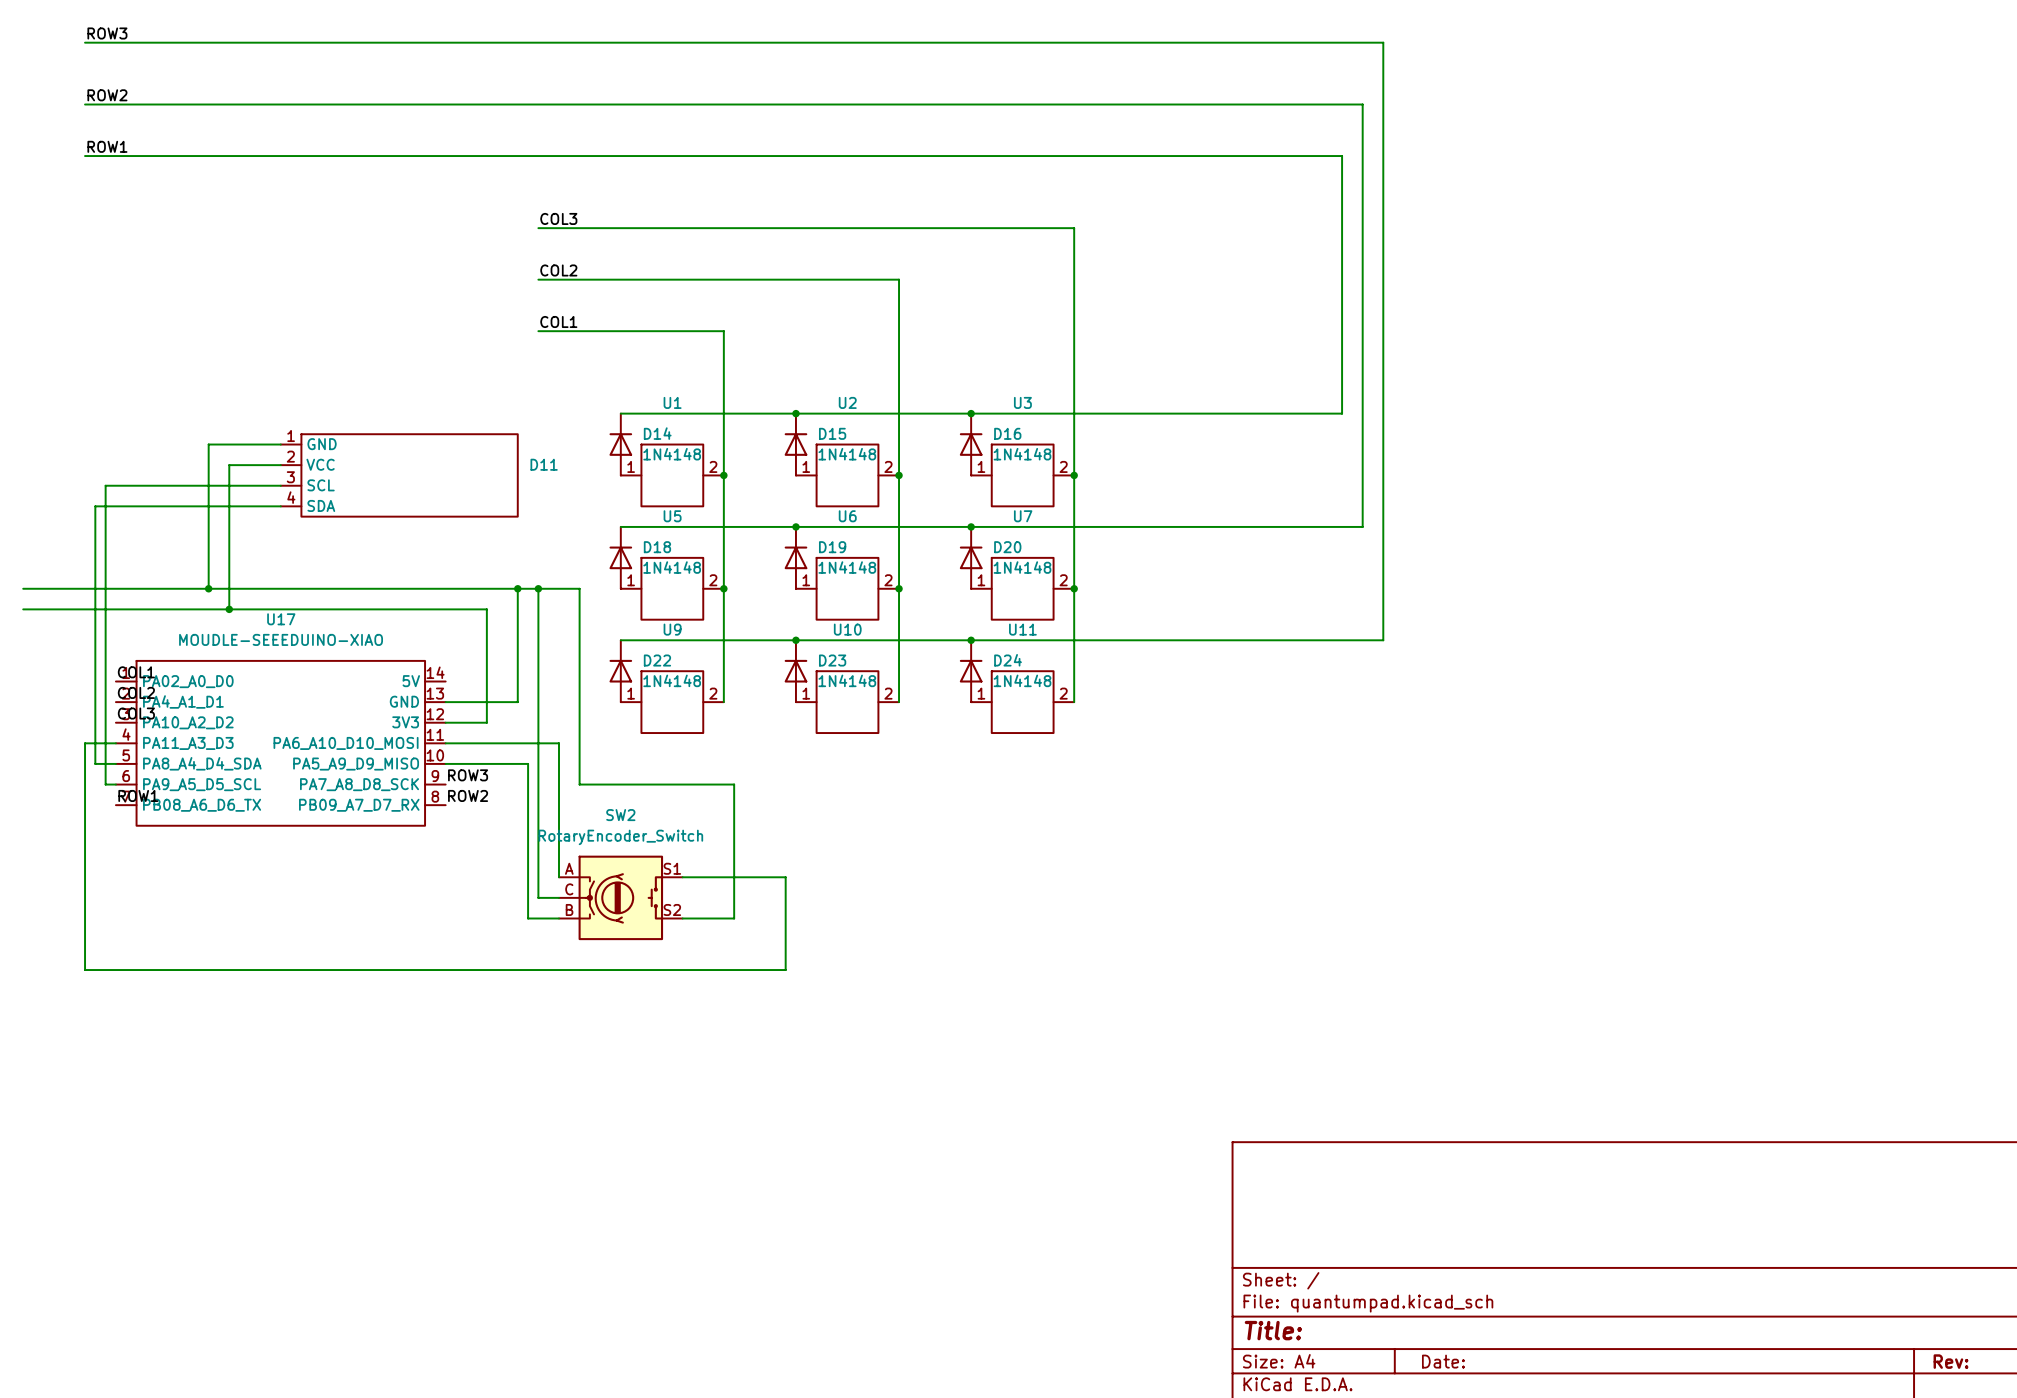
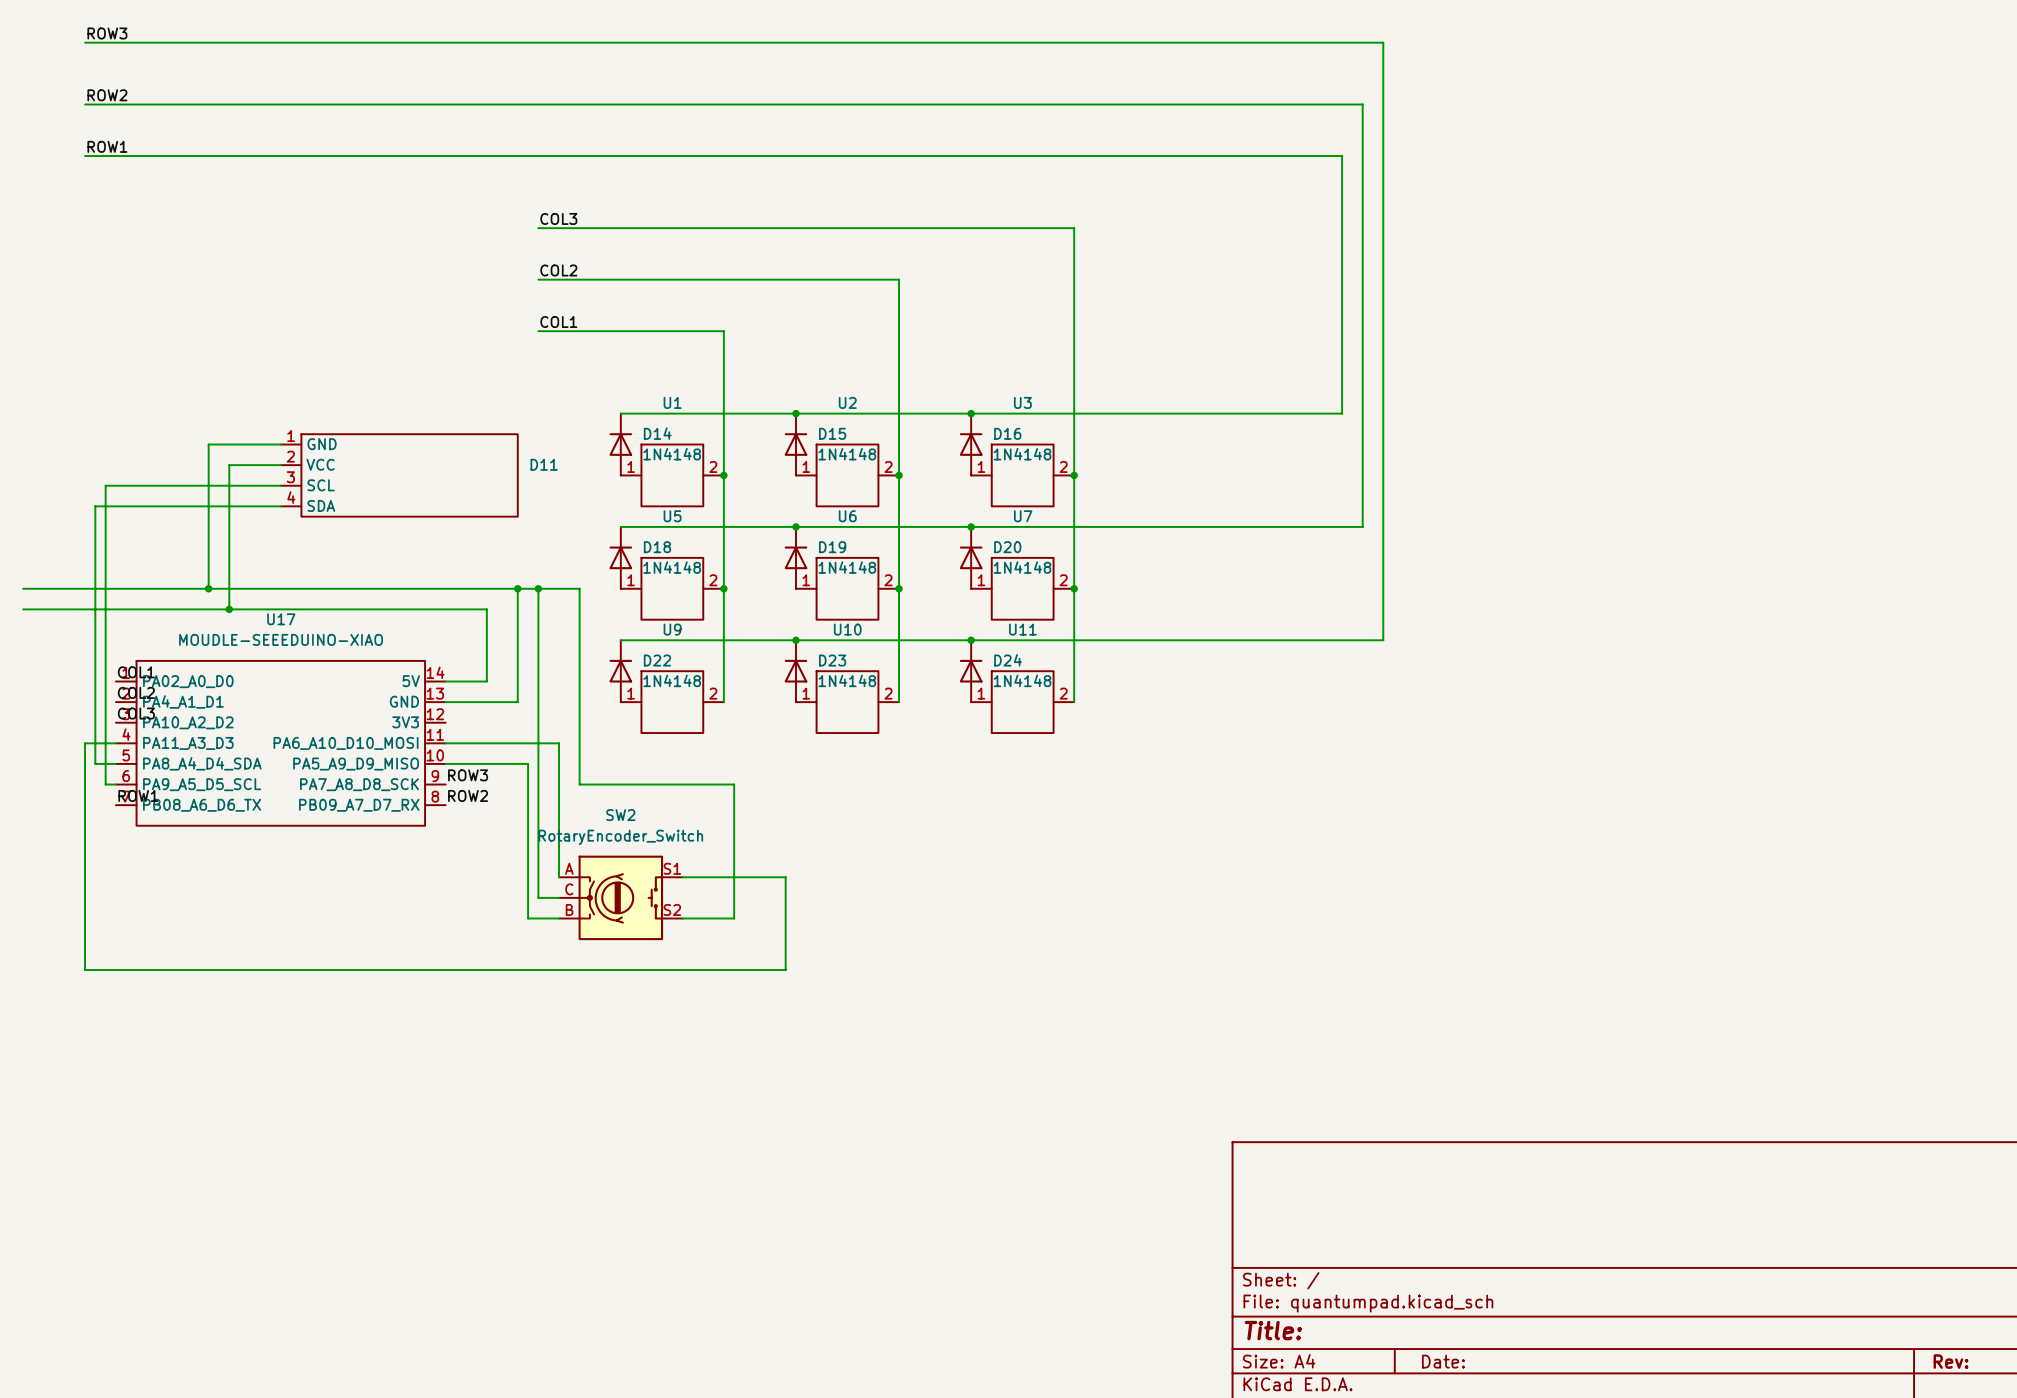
wire: (486, 681) (486, 722) (445, 722) -> (486, 681) (445, 681)

